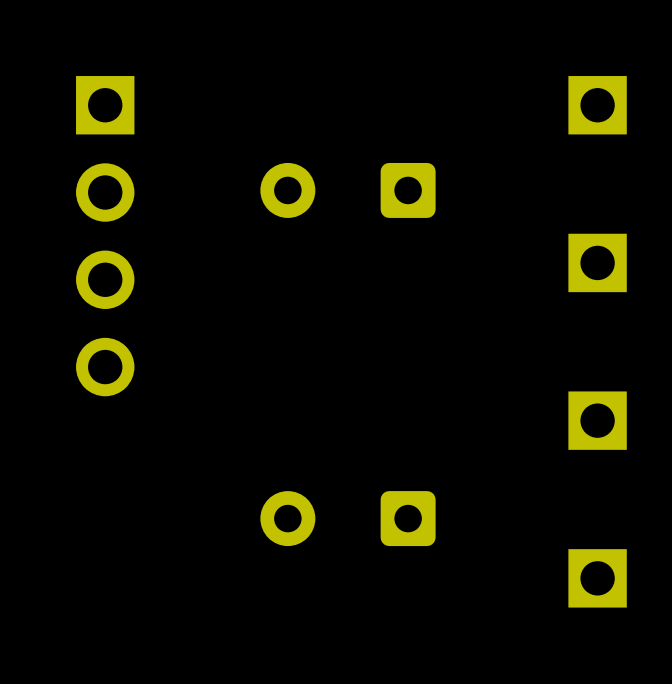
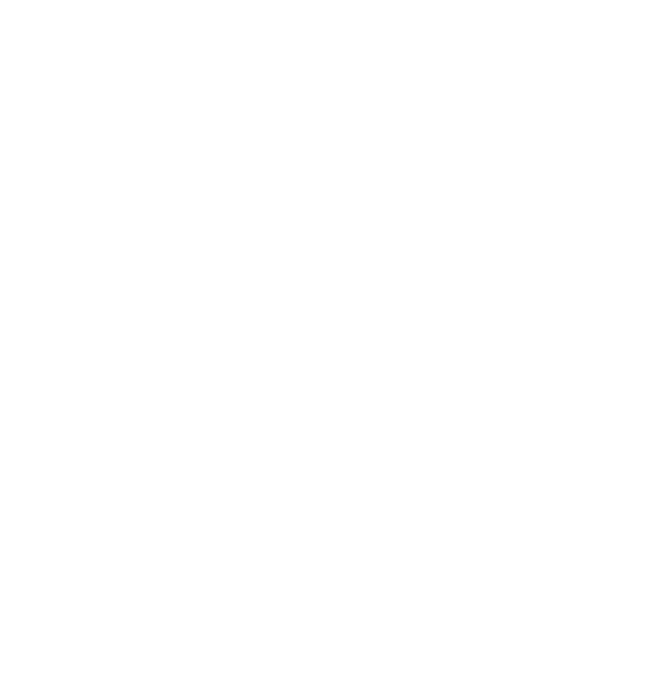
part: (597, 105) -> none
part: (347, 190) -> none
part: (105, 236) -> none
part: (597, 262) -> none
part: (597, 420) -> none
part: (347, 518) -> none
part: (597, 578) -> none

